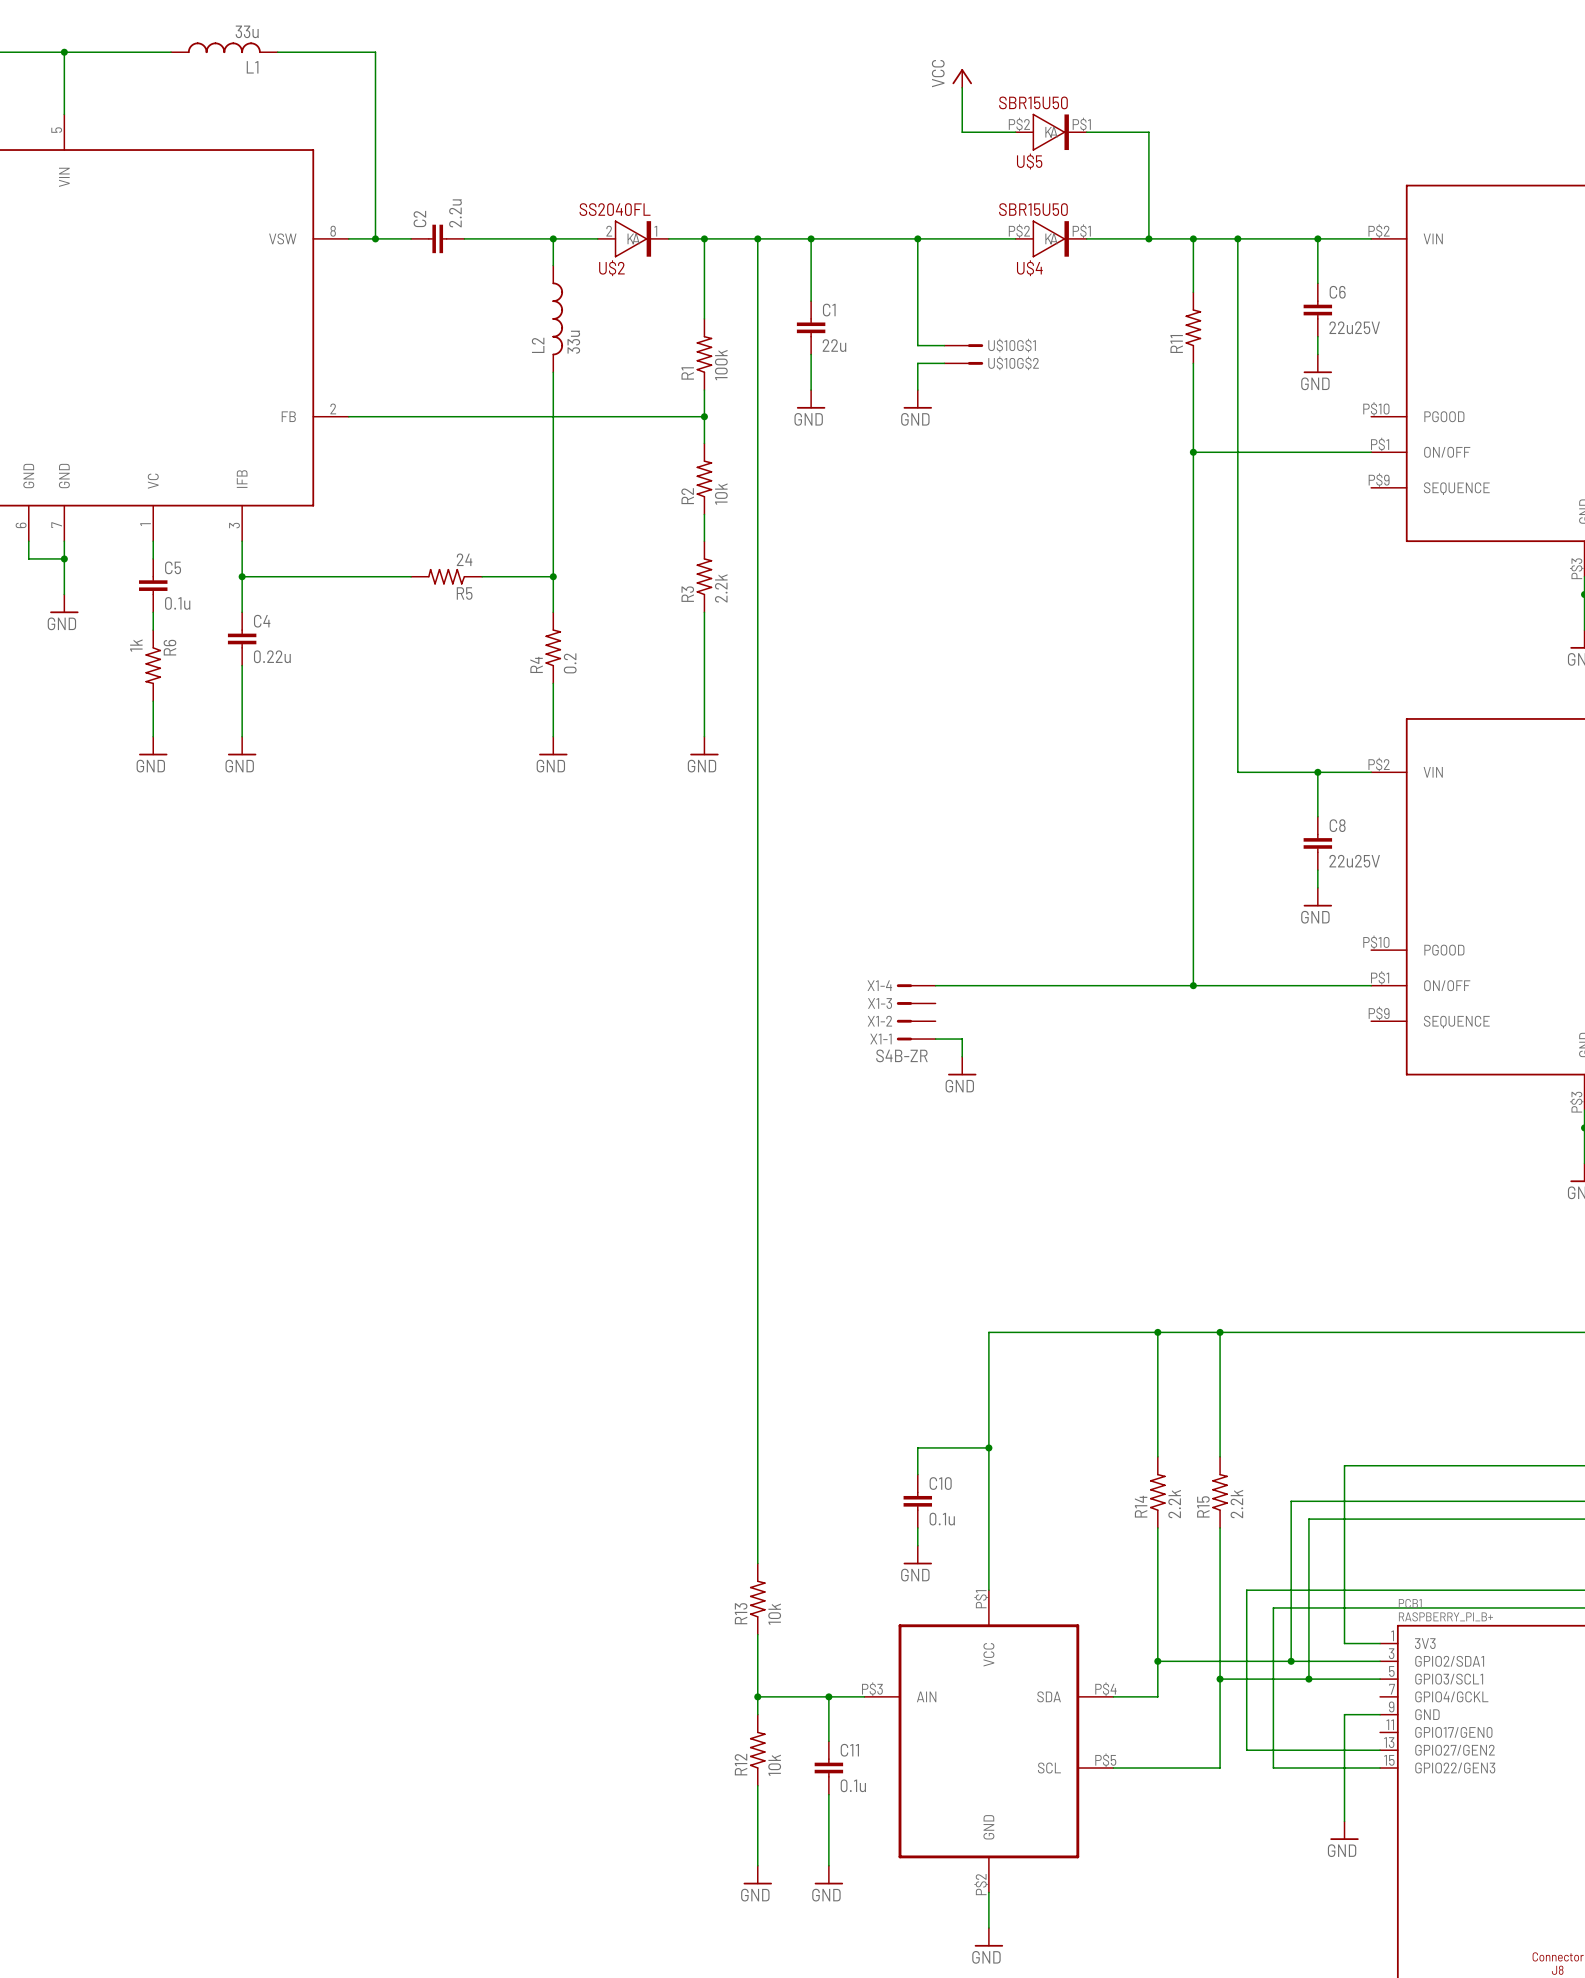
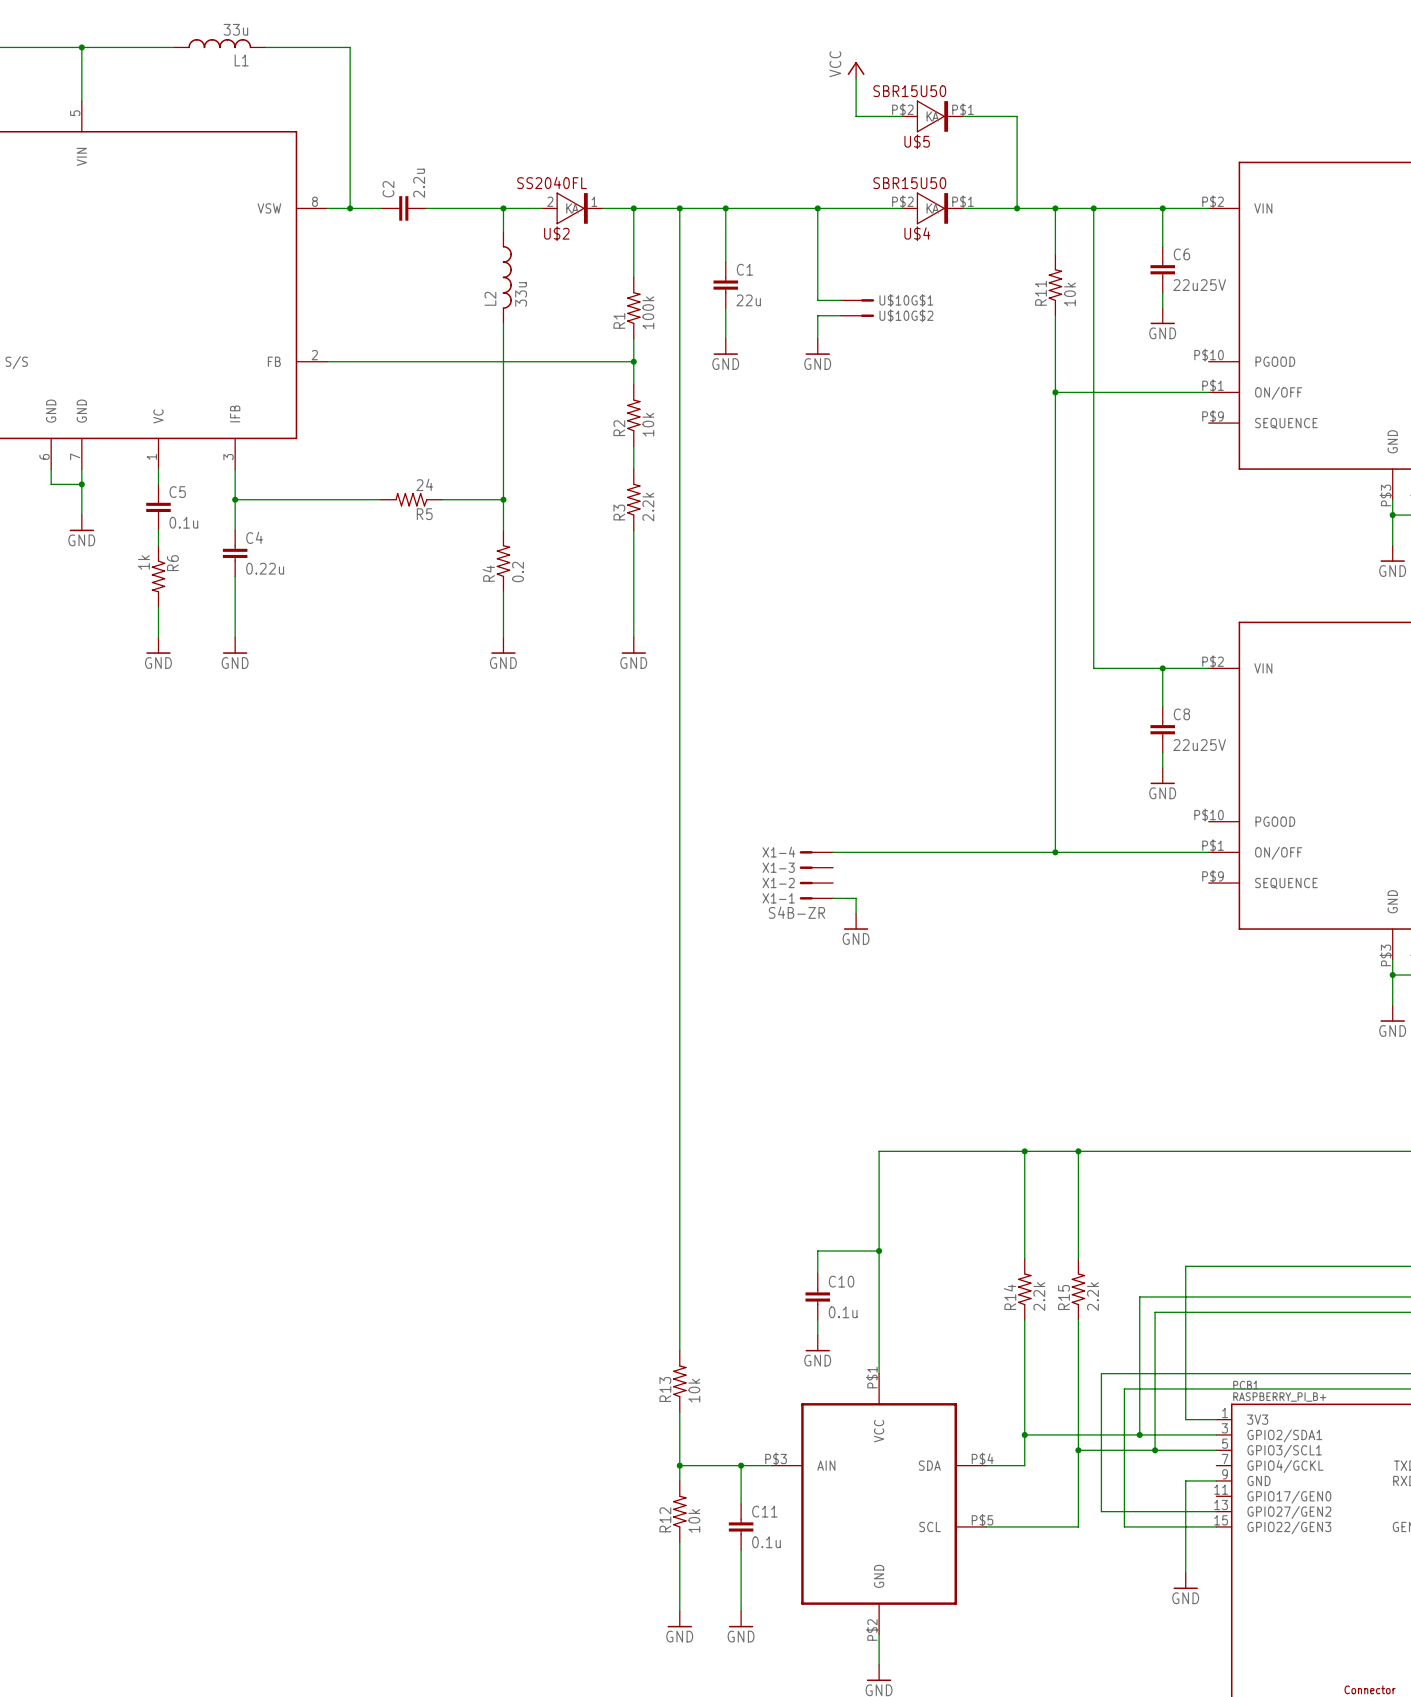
R11 value: none -> 10k (1069, 294)

